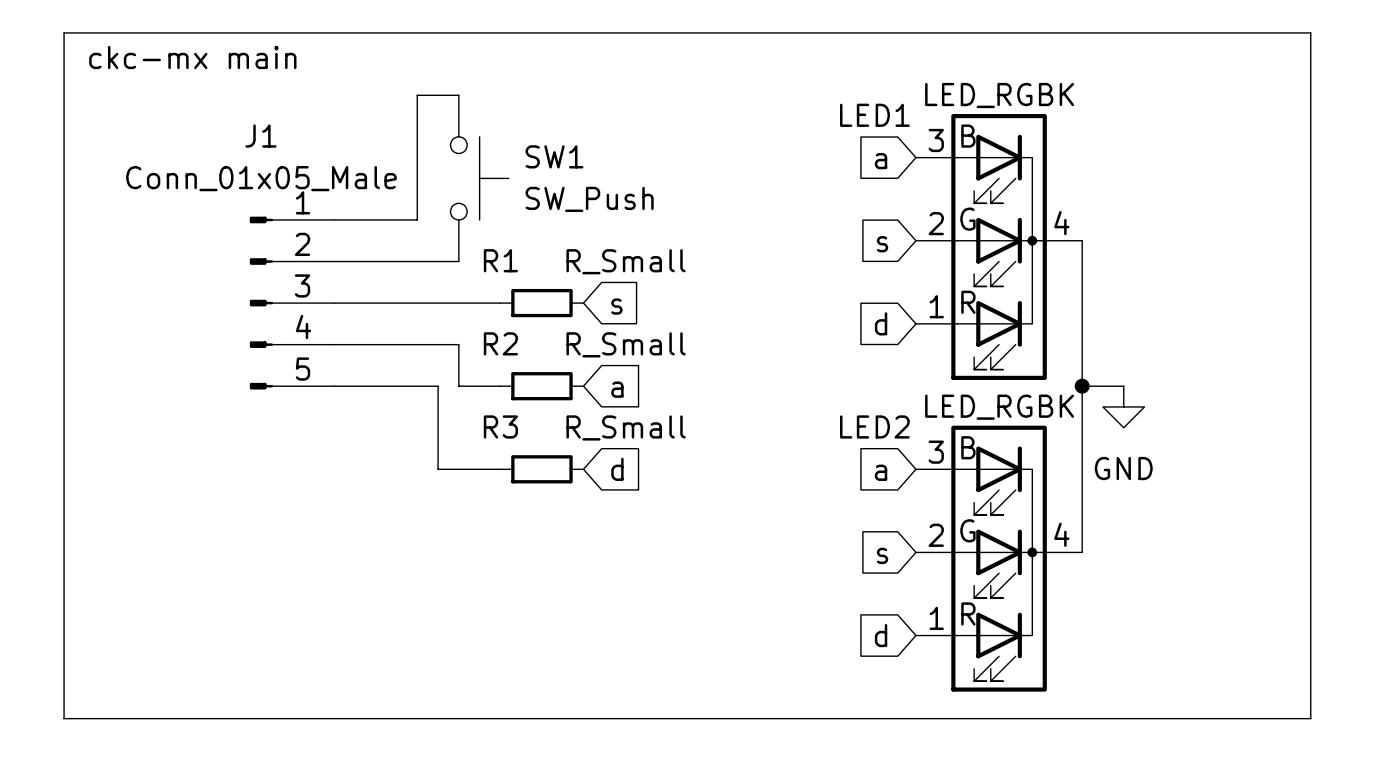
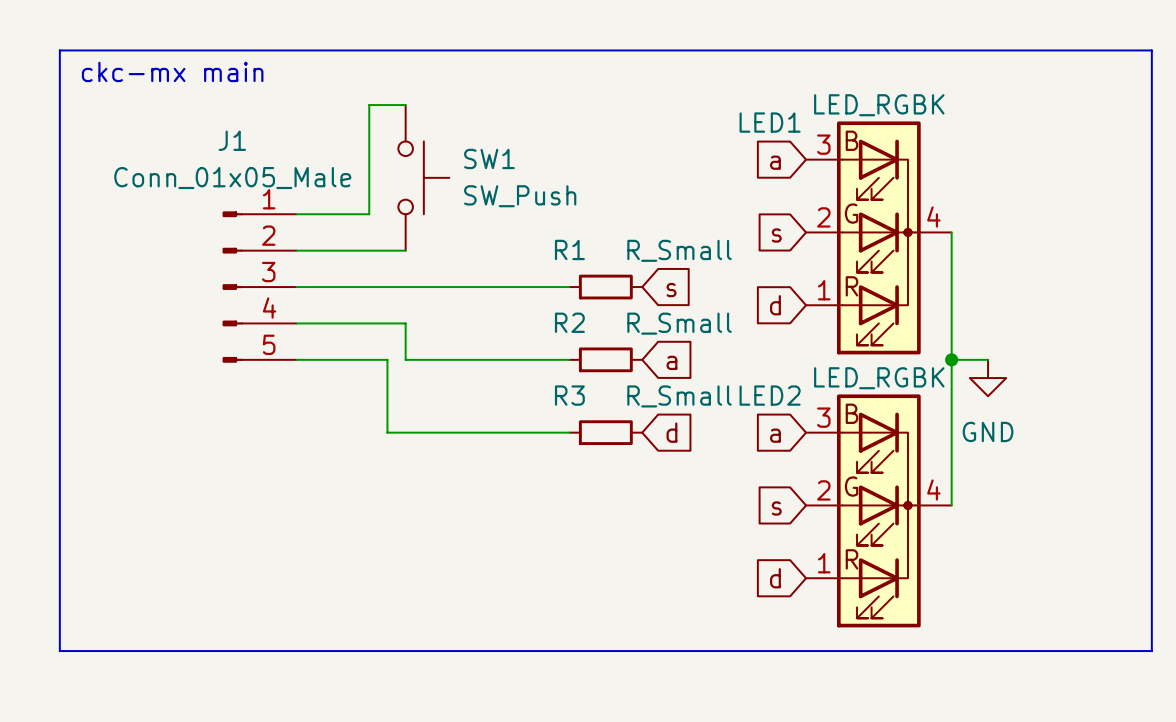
wire: none -> (442, 287) (569, 287)
R1 position: (541, 303) -> (605, 287)
global label position: s (616, 306) -> s (671, 290)
wire: none -> (442, 359) (569, 359)
R2 position: (541, 386) -> (605, 359)
global label position: a (617, 389) -> a (671, 362)
wire: none -> (442, 432) (569, 432)
R3 position: (541, 469) -> (605, 432)
global label position: d (617, 469) -> d (671, 432)

